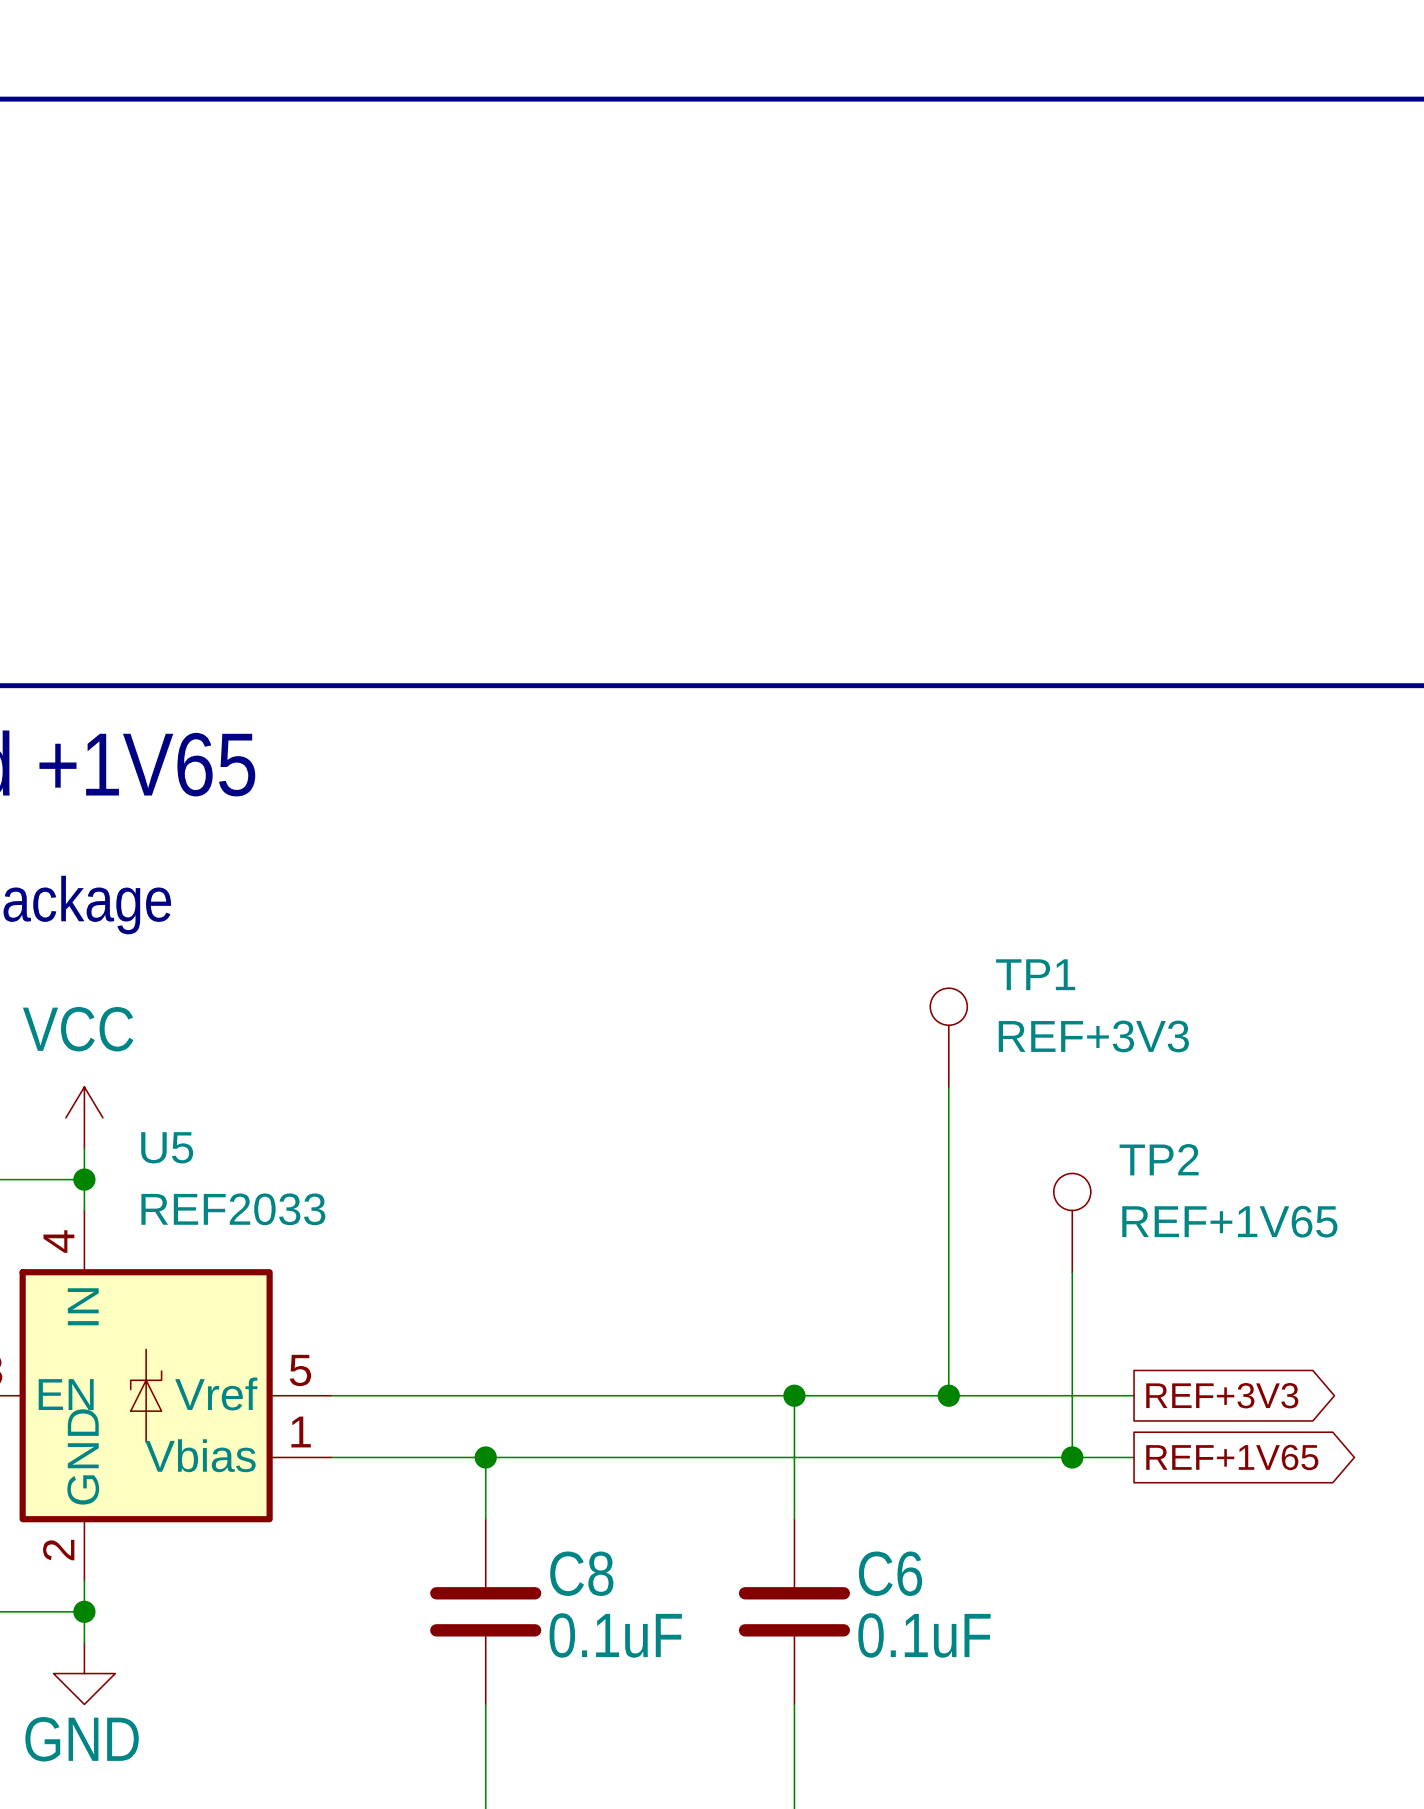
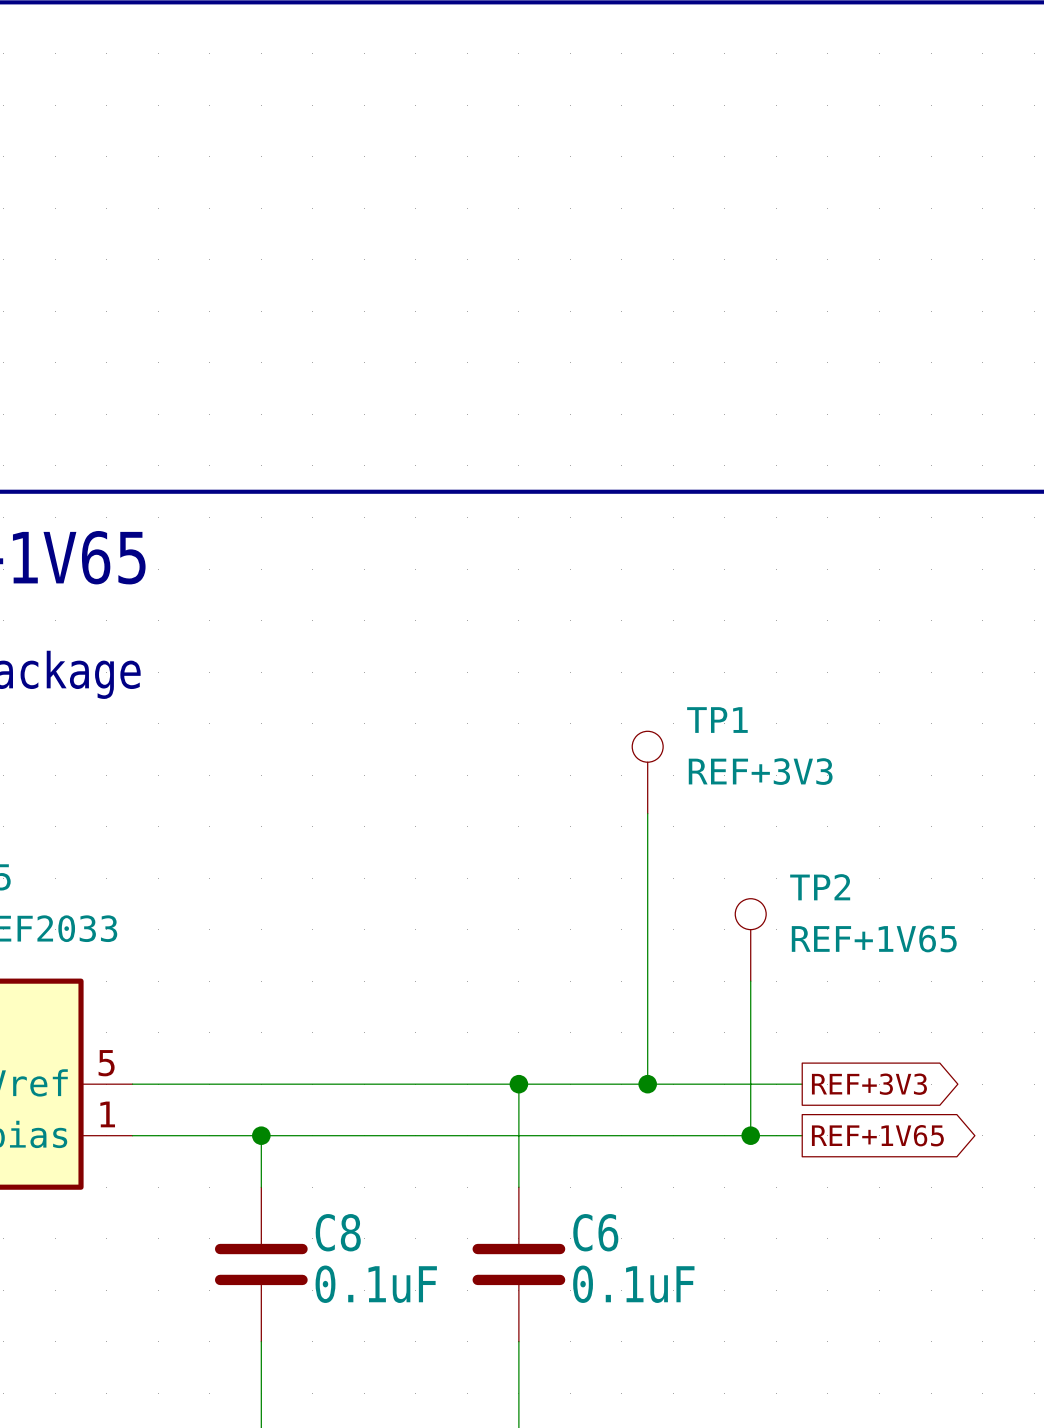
TP1 position: (948, 1037) -> (647, 772)

